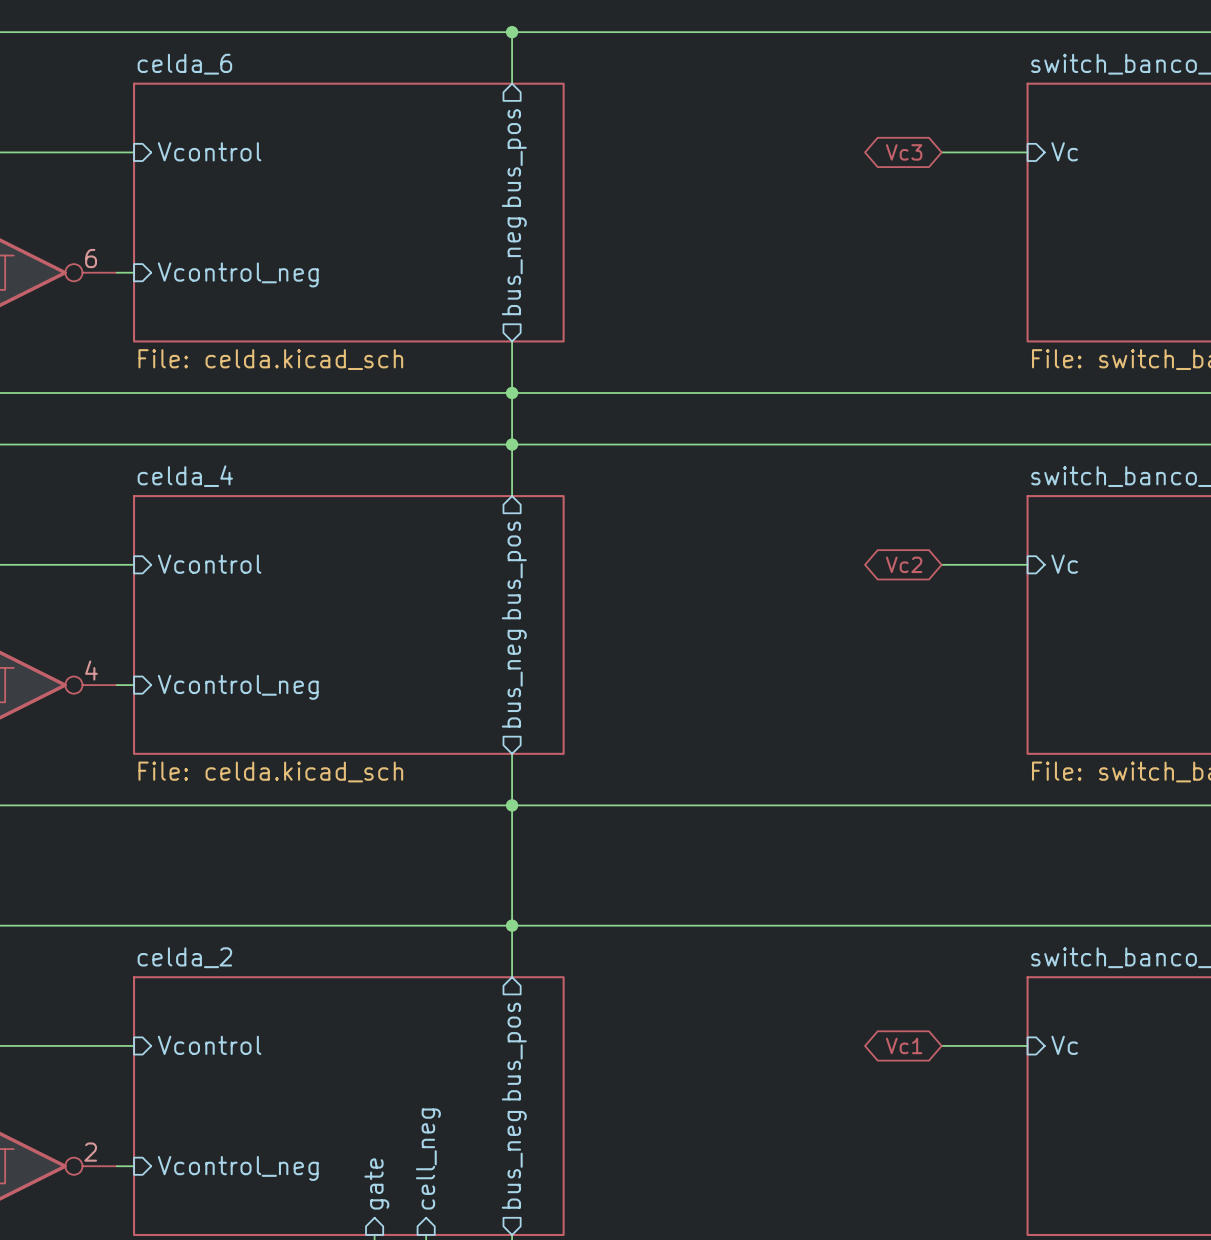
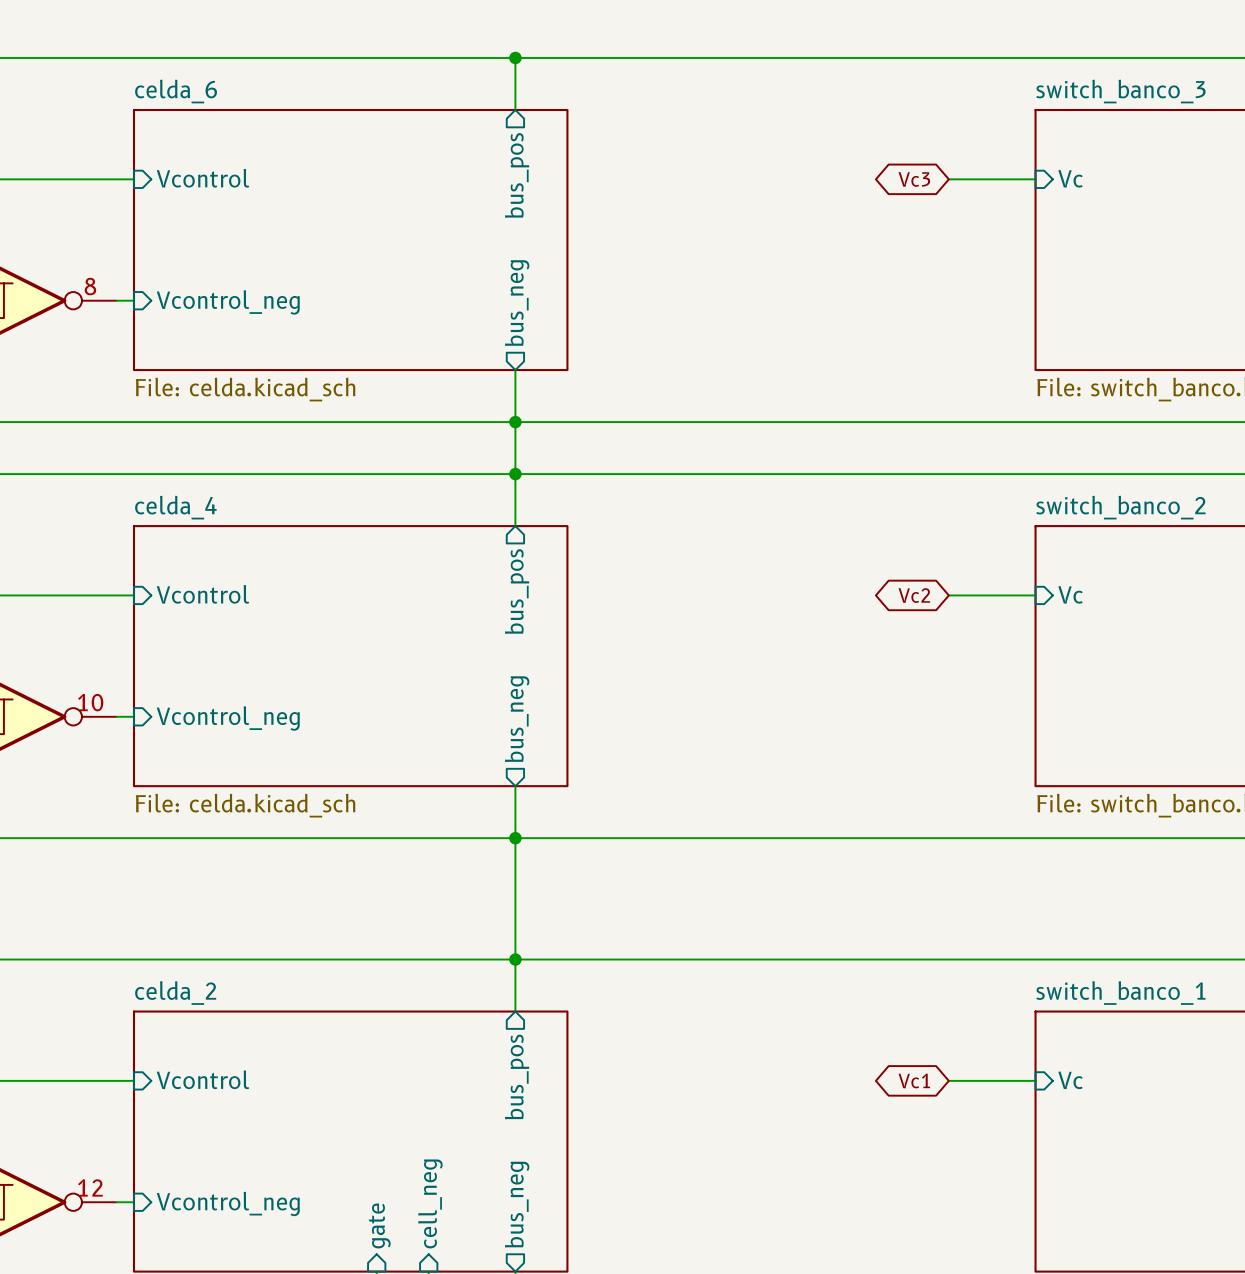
part pin number: 6 (91, 258) -> 8 (90, 286)
part pin number: 4 (91, 670) -> 10 (90, 702)
part pin number: 2 (90, 1152) -> 12 (90, 1187)

